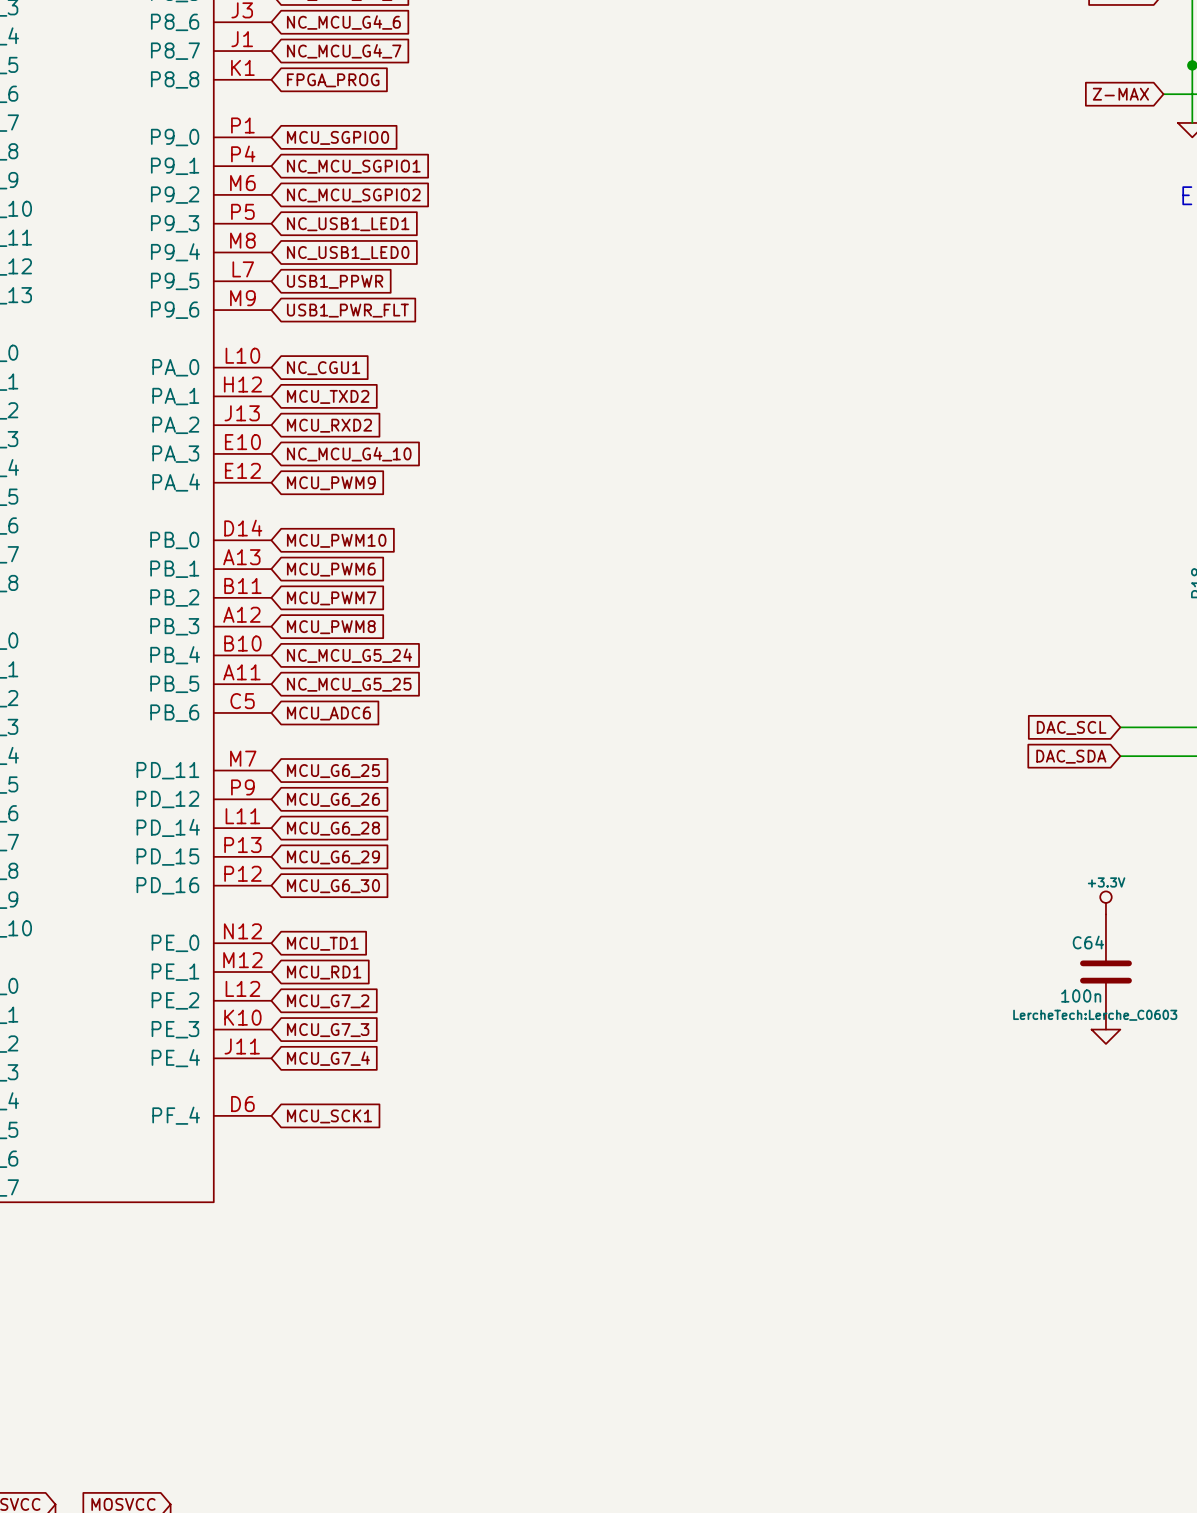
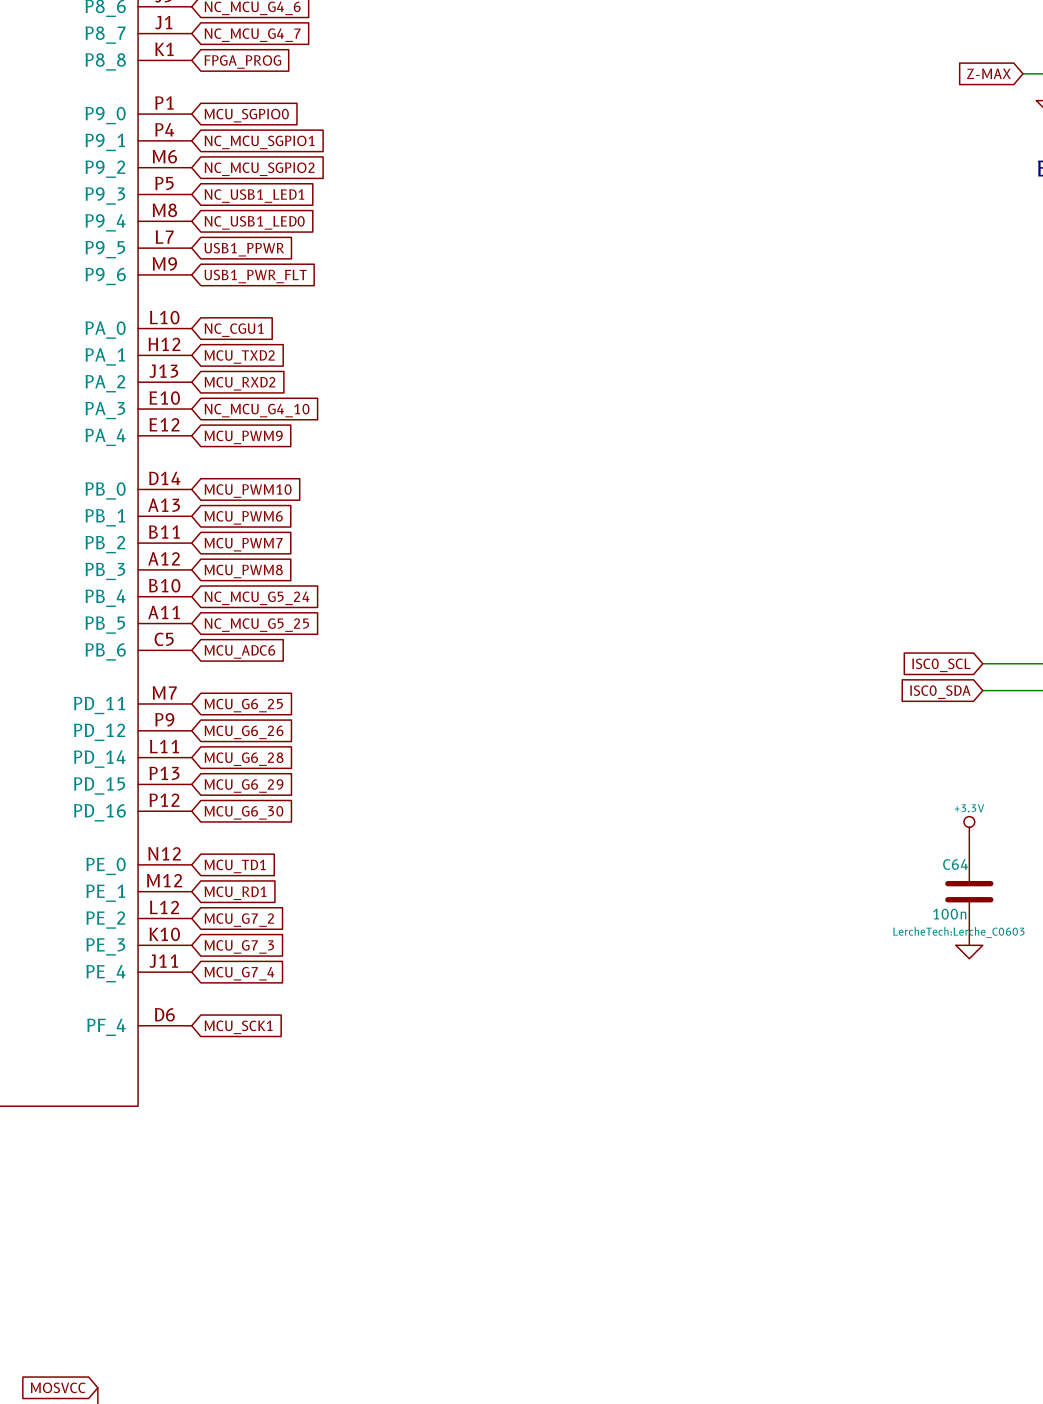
global label: DAC_SCL (1071, 727) -> ISC0_SCL (941, 665)
global label: DAC_SDA (1071, 756) -> ISC0_SDA (940, 692)

